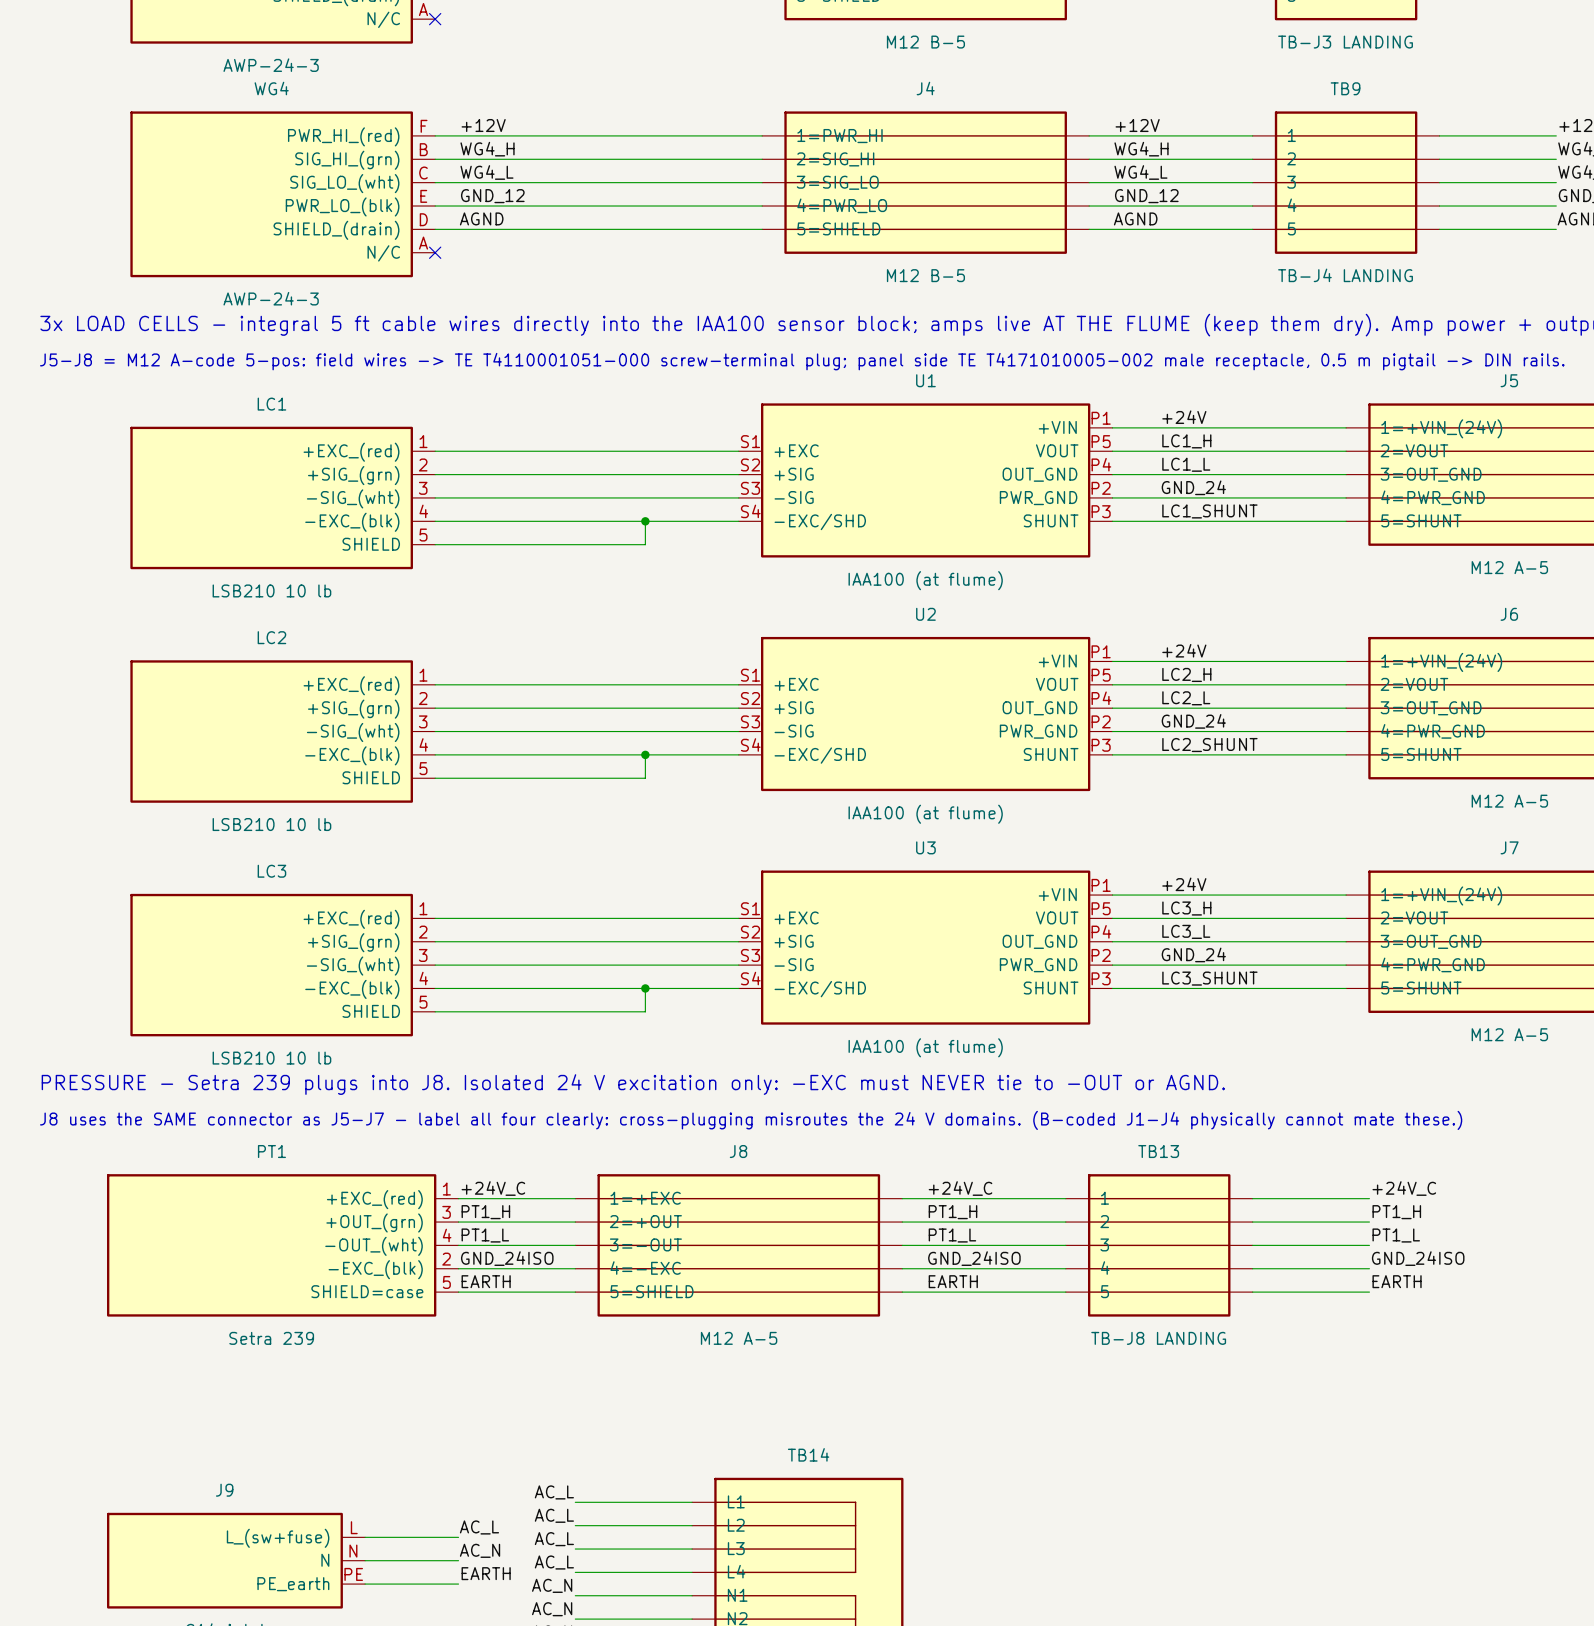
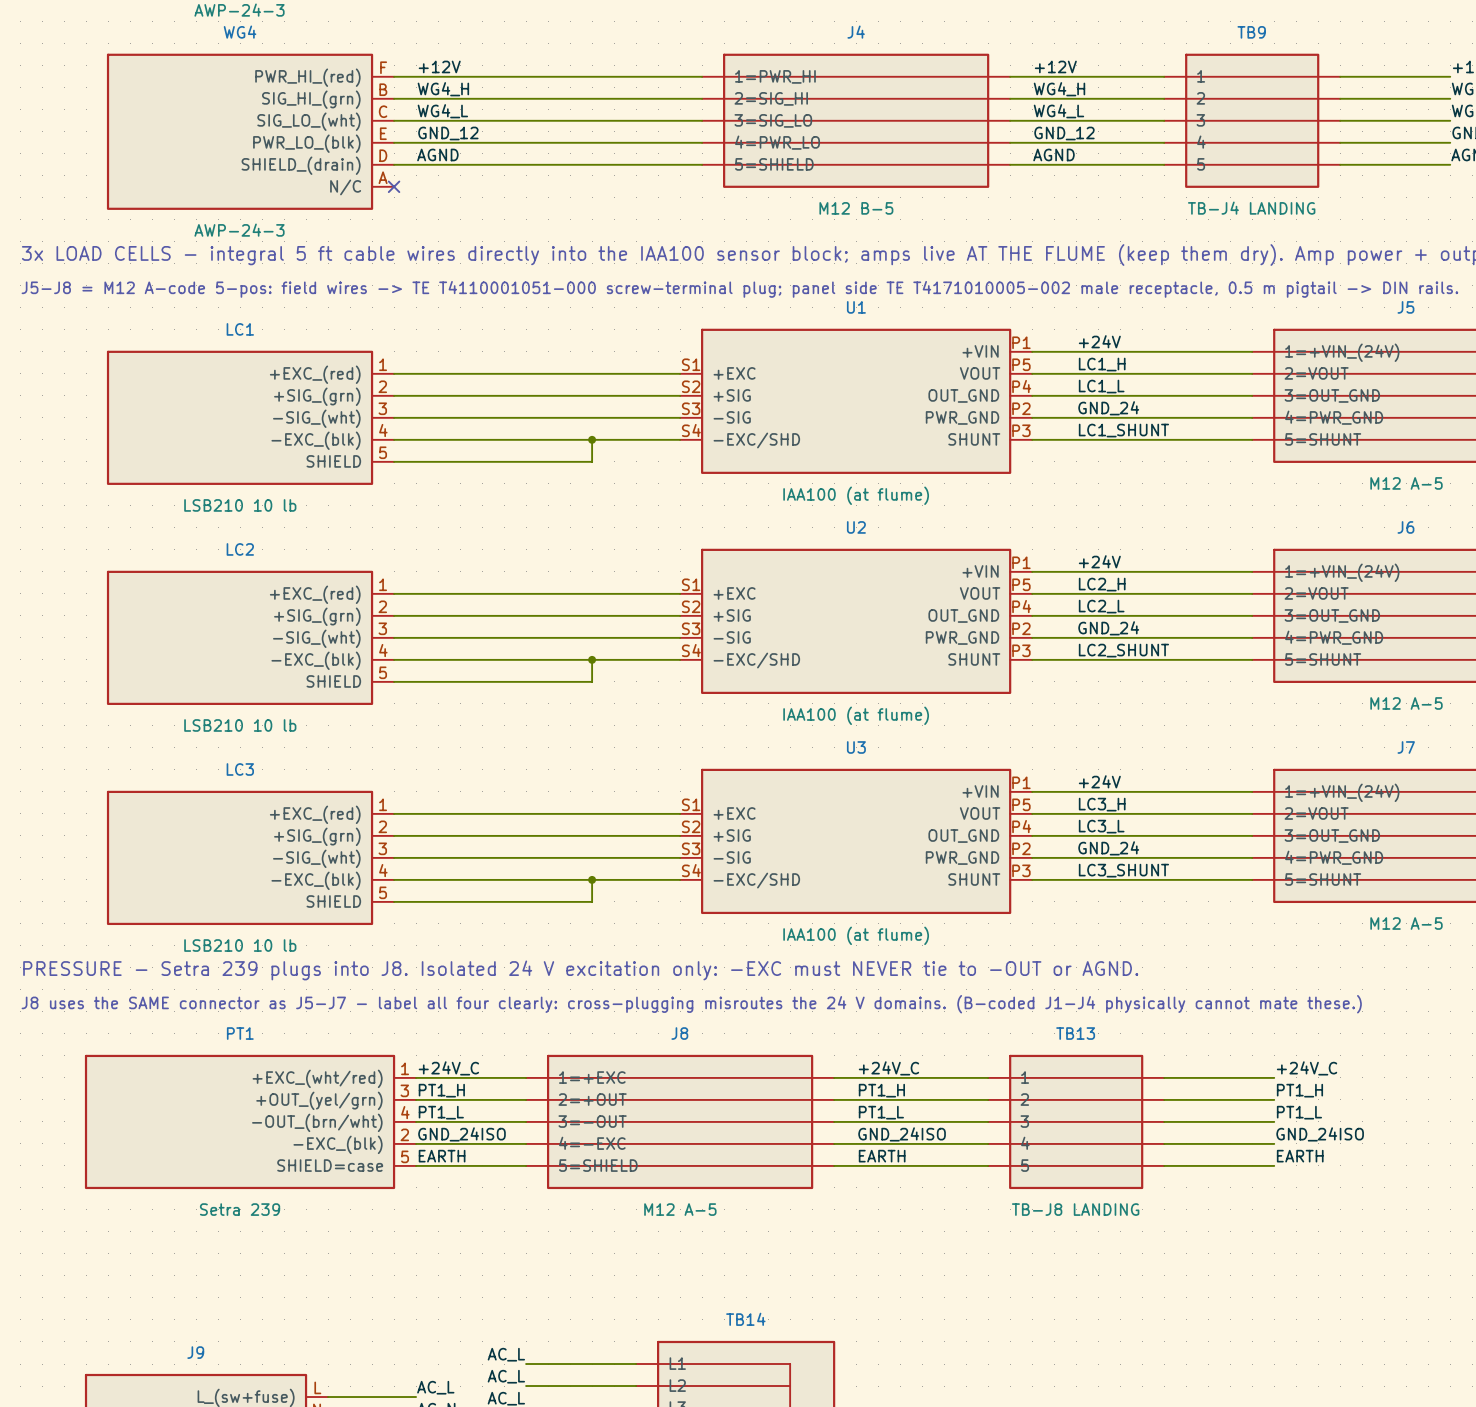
PT1 pin name: +EXC_(red) (374, 1199) -> +EXC_(wht/red) (317, 1078)
PT1 pin name: +OUT_(grn) (374, 1222) -> +OUT_(yel/grn) (319, 1100)
PT1 pin name: -OUT_(wht) (374, 1246) -> -OUT_(brn/wht) (317, 1122)

